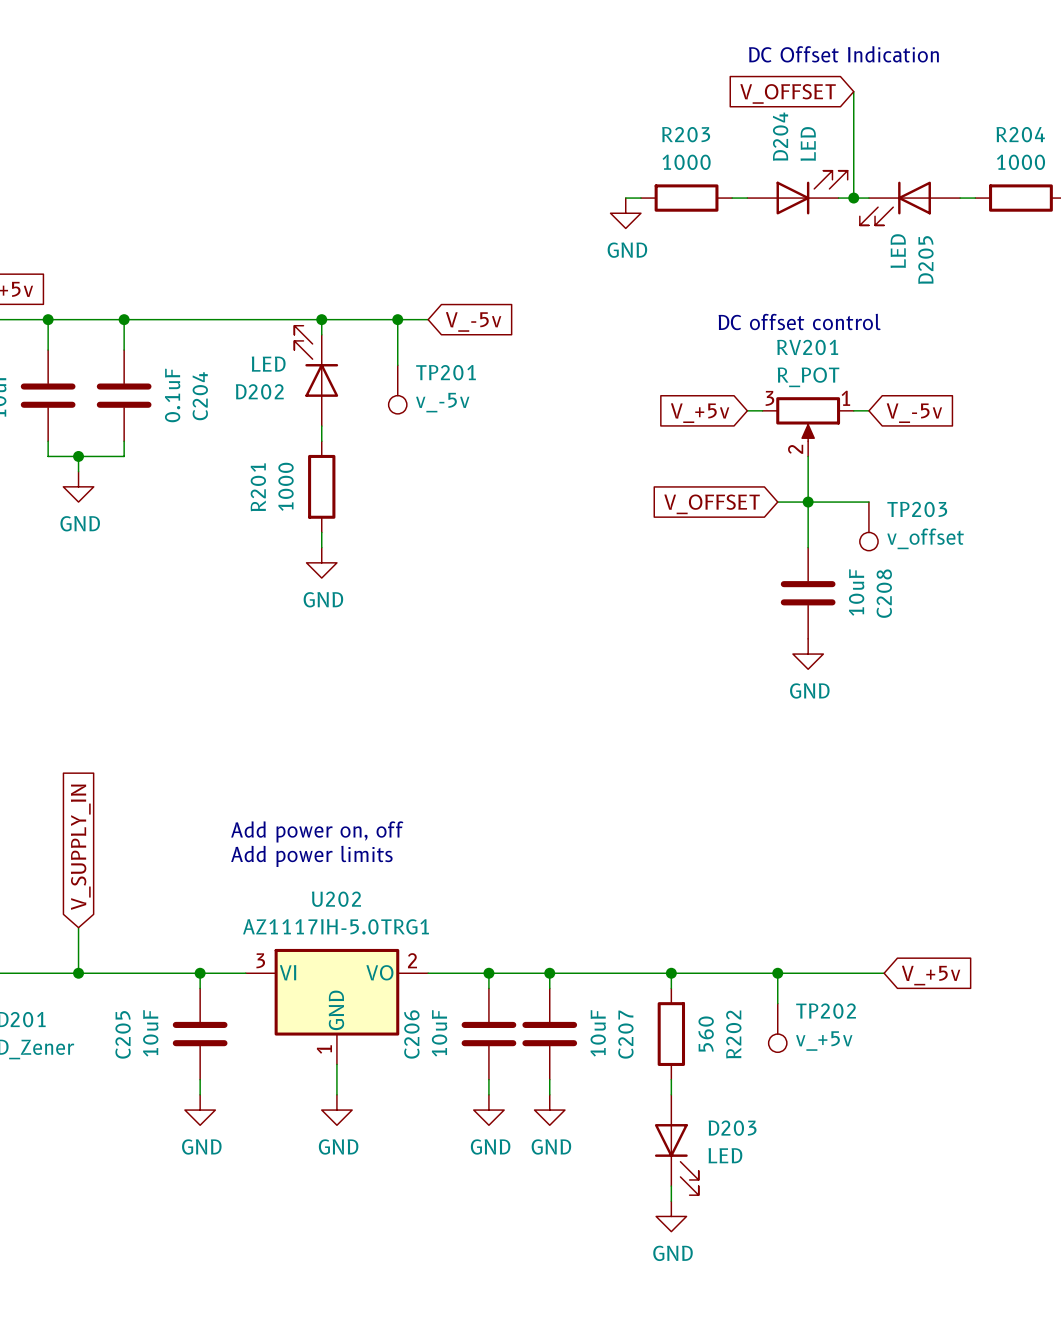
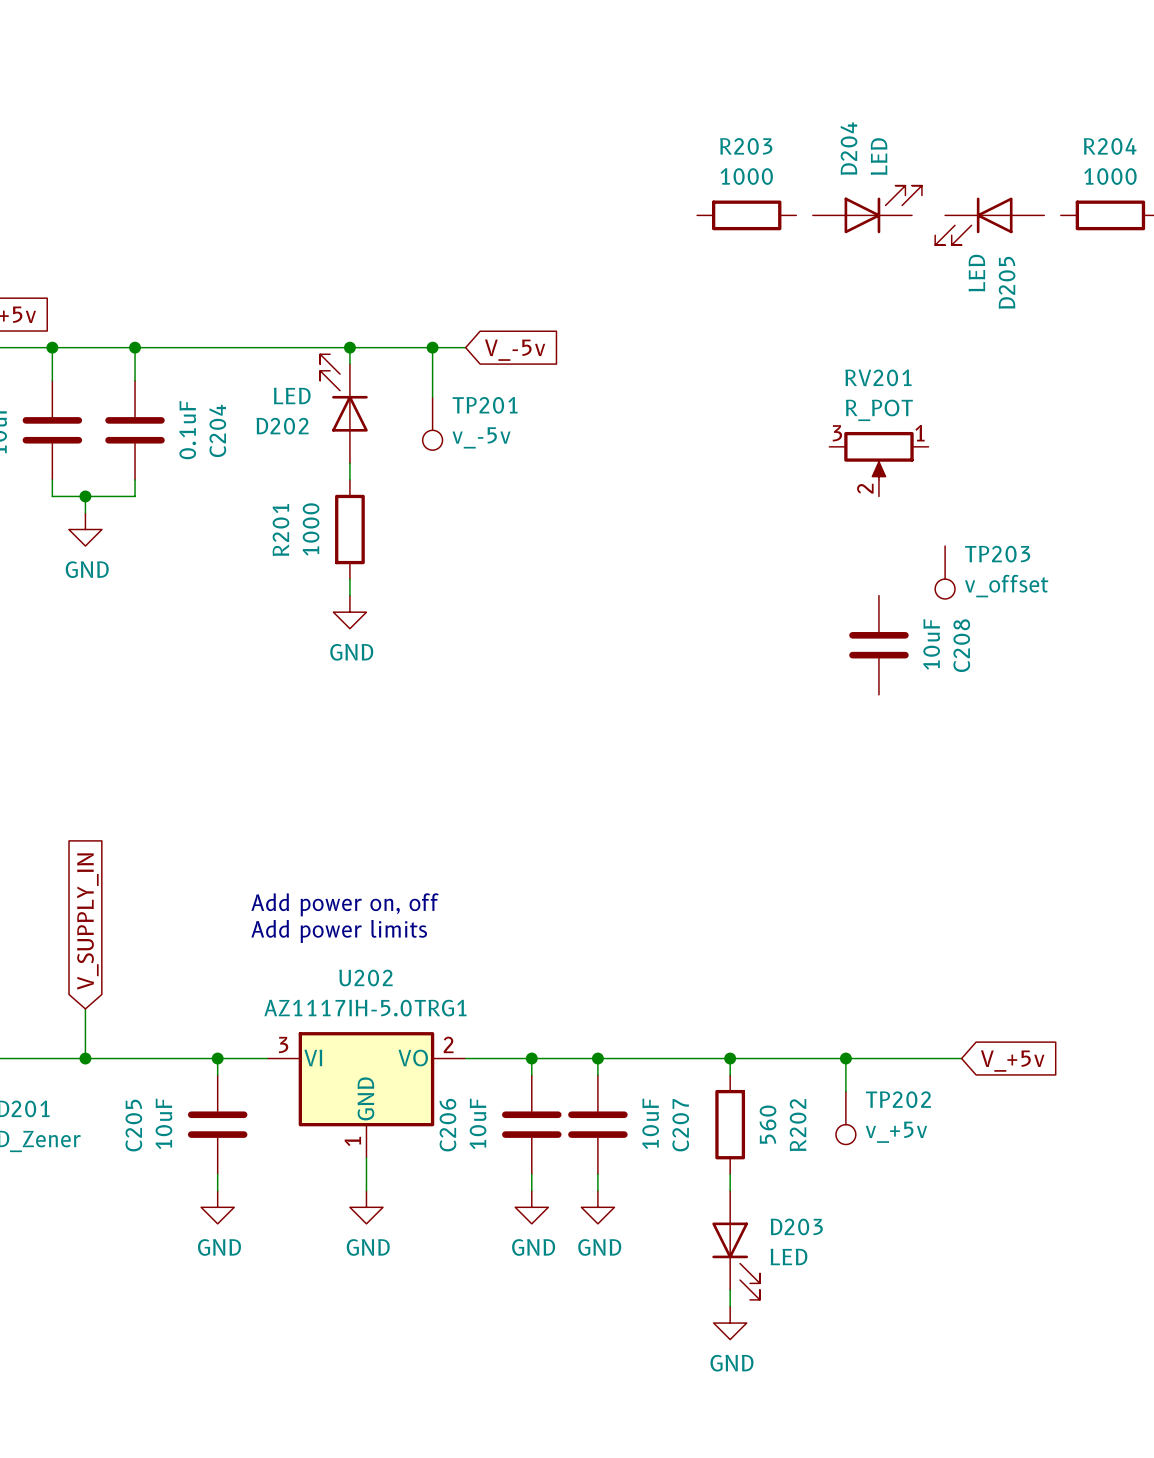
text: DC Offset Indication (843, 54) -> none
wire: (853, 91) (853, 198) -> none
global label: V_OFFSET (788, 93) -> none
wire: (625, 198) (640, 198) -> none
wire: (732, 198) (747, 198) -> none
wire: (838, 198) (868, 198) -> none
junction: (853, 198) -> none
wire: (960, 198) (975, 198) -> none
power symbol: GND (625, 213) -> none
text: DC offset control (799, 321) -> none
wire: (747, 410) (762, 410) -> none
wire: (853, 410) (868, 410) -> none
global label: V_+5v (700, 413) -> none
global label: V_-5v (914, 413) -> none
wire: (808, 456) (808, 547) -> none
wire: (777, 502) (868, 502) -> none
junction: (808, 502) -> none
global label: V_OFFSET (712, 504) -> none
power symbol: GND (808, 654) -> none

